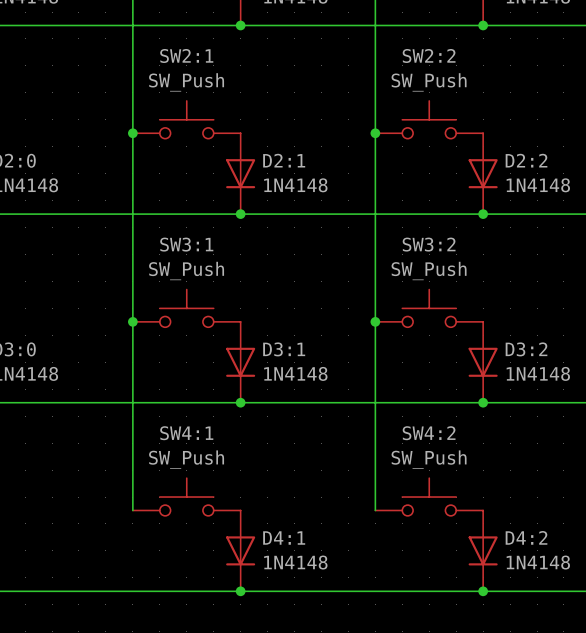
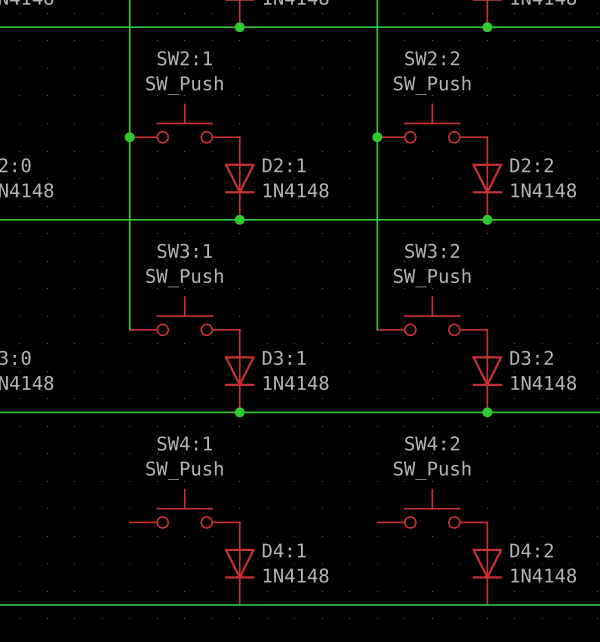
wire: (132, 321) (132, 510) -> none
junction: (132, 321) -> none
wire: (375, 321) (375, 510) -> none
junction: (375, 321) -> none
junction: (240, 591) -> none
junction: (483, 591) -> none

